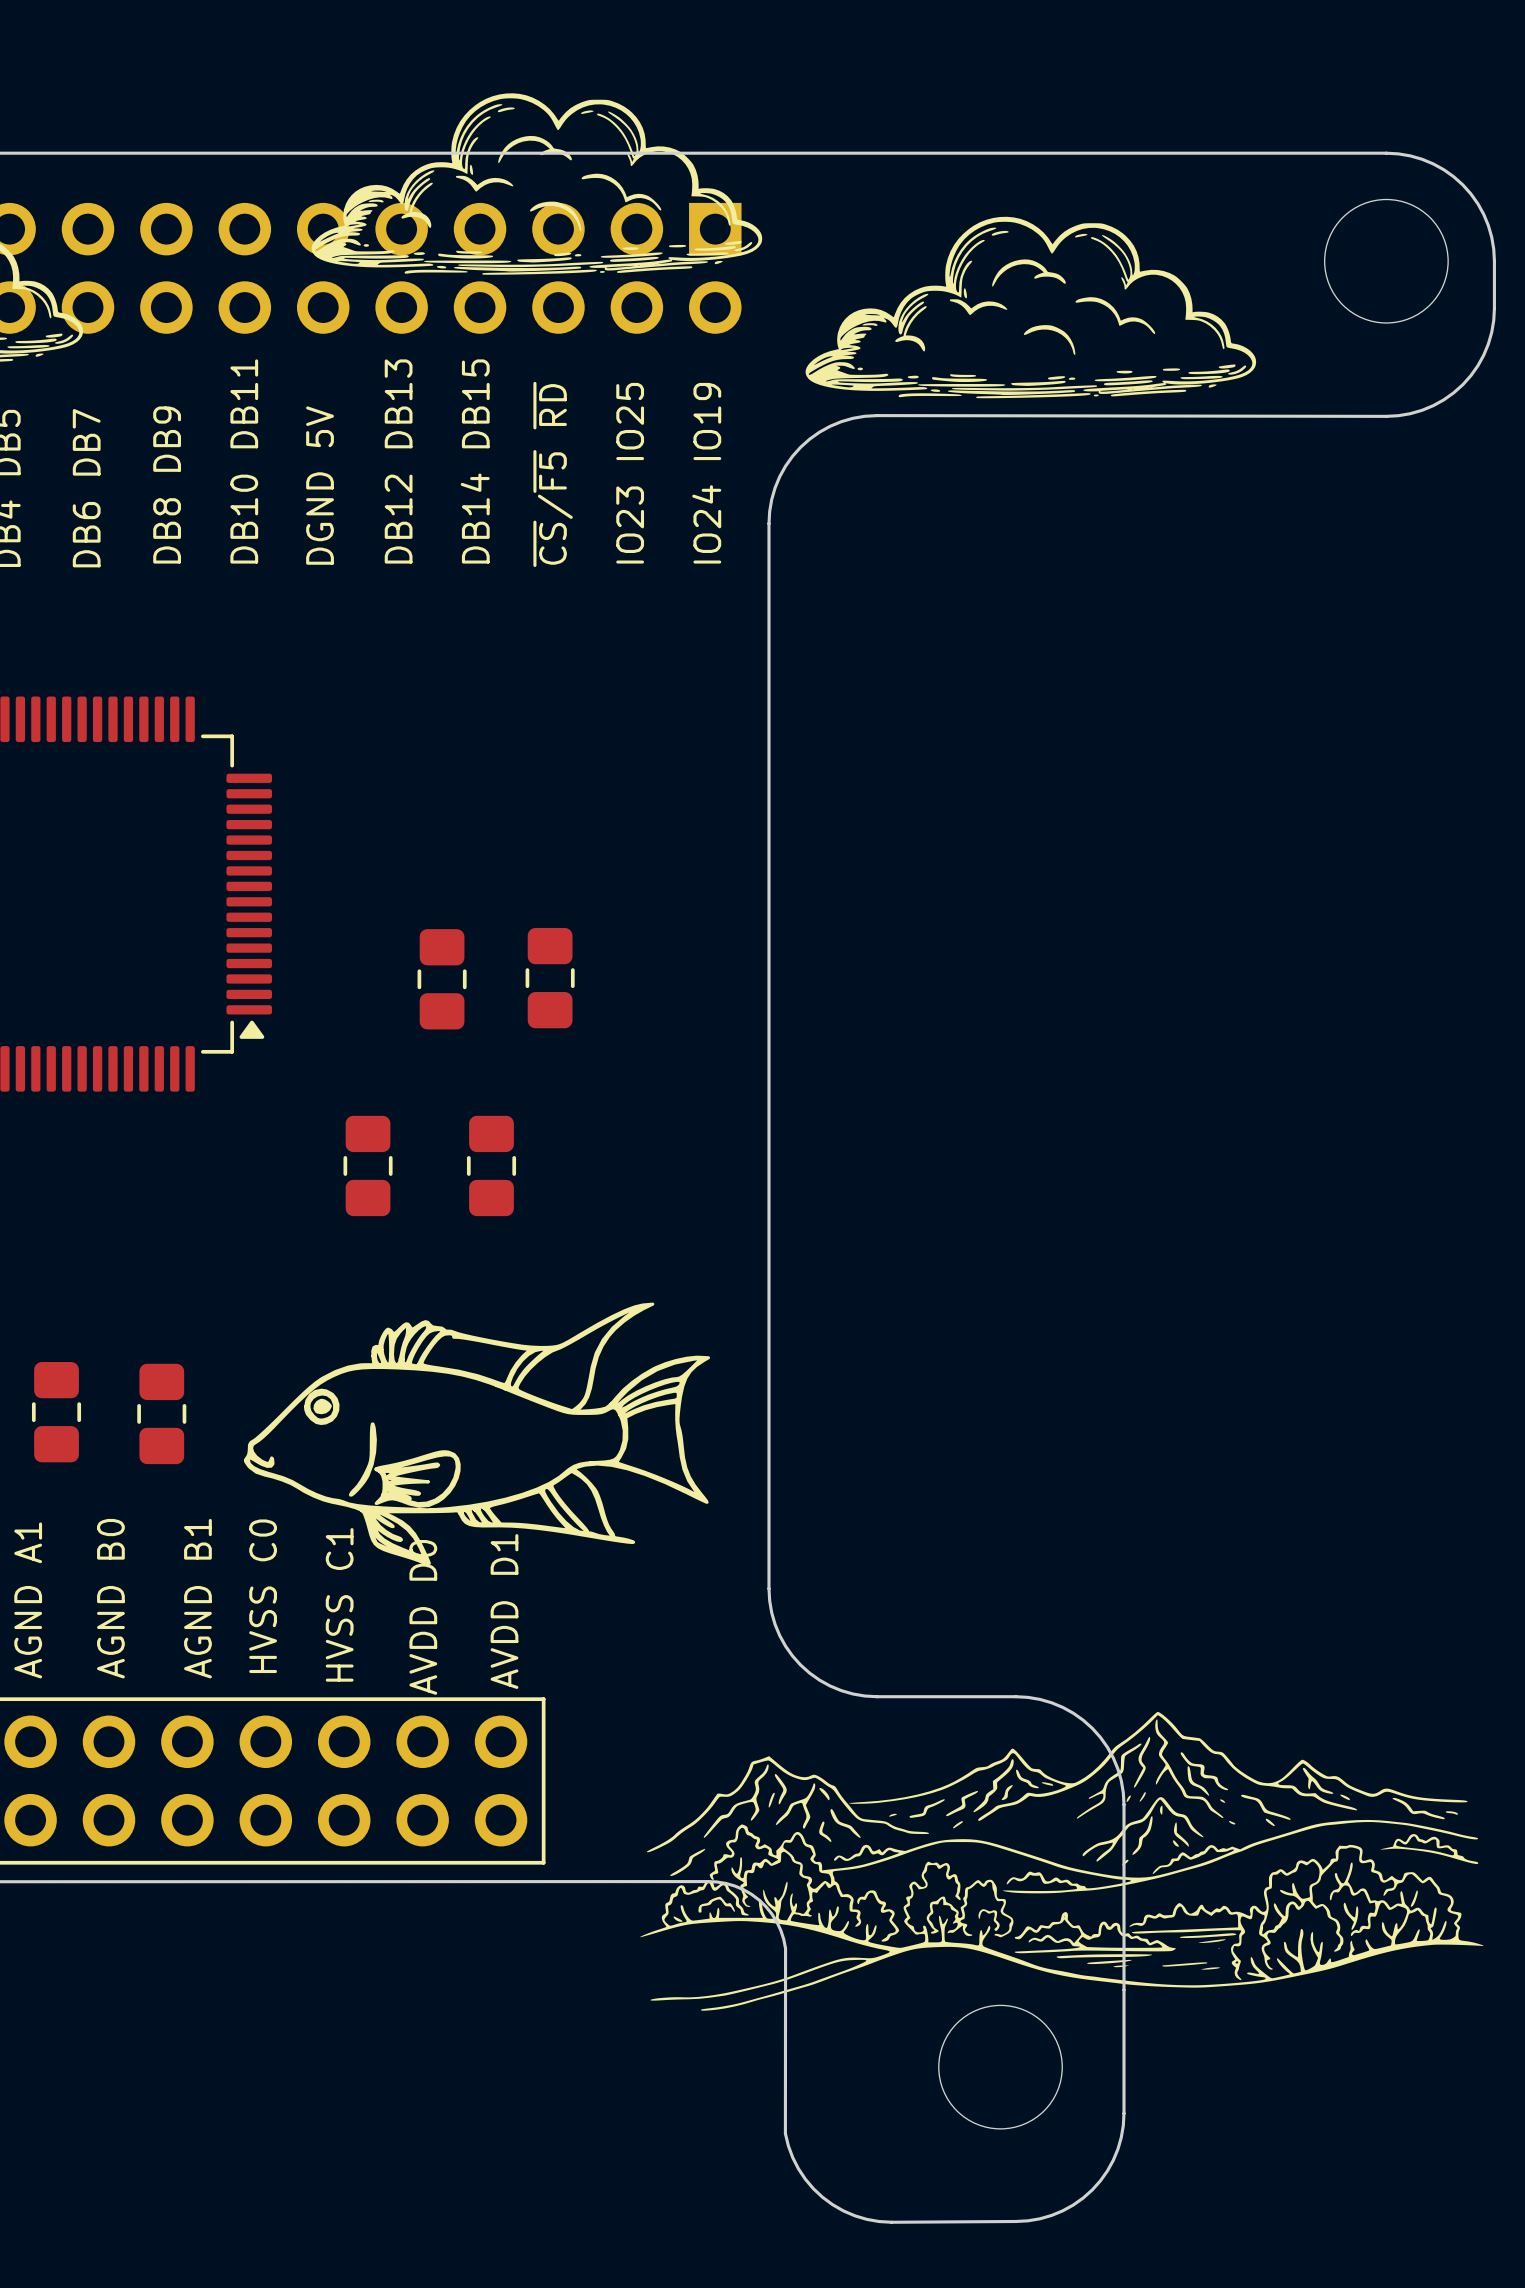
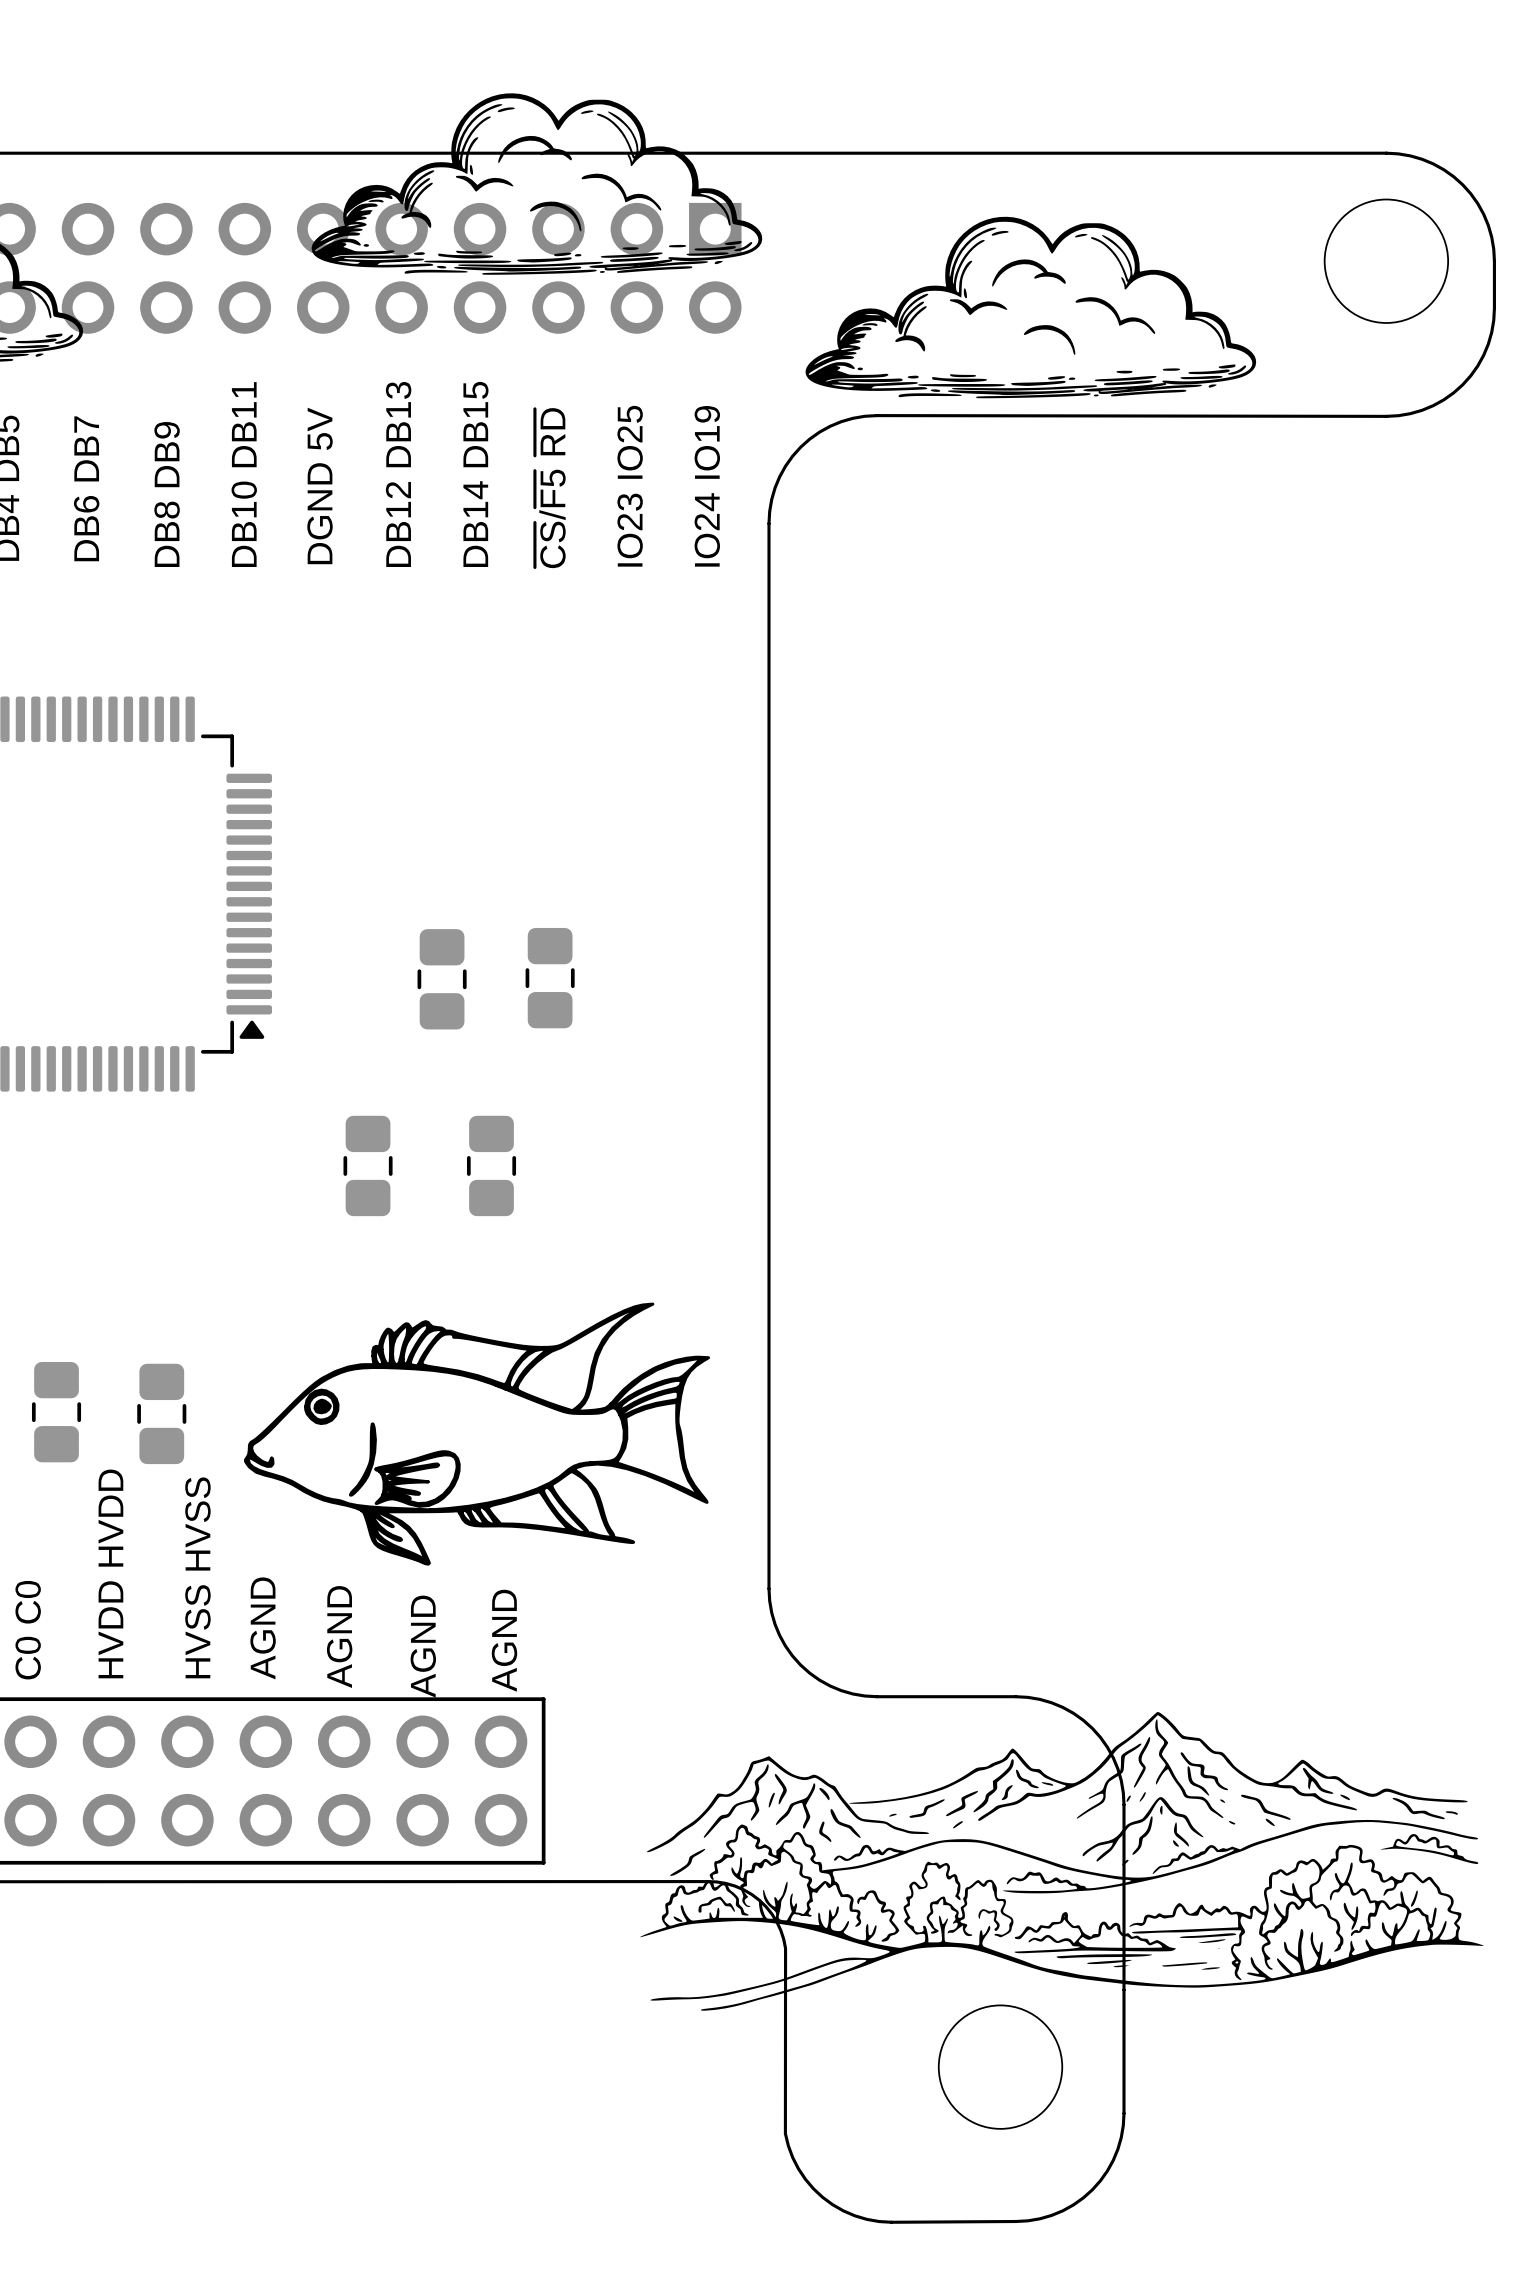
text: HVSS C0 (263, 1596) -> AGND (263, 1628)
text: AGND B0 (110, 1598) -> HVDD HVDD (110, 1573)
text: AGND B1 (197, 1598) -> HVSS HVSS (197, 1577)
text: AGND A1 (28, 1600) -> C0 C0 (28, 1630)
text: HVSS C1 (339, 1604) -> AGND (339, 1637)
text: AVDD D1 (504, 1611) -> AGND (504, 1640)
text: AVDD D0 (423, 1617) -> AGND (423, 1646)

